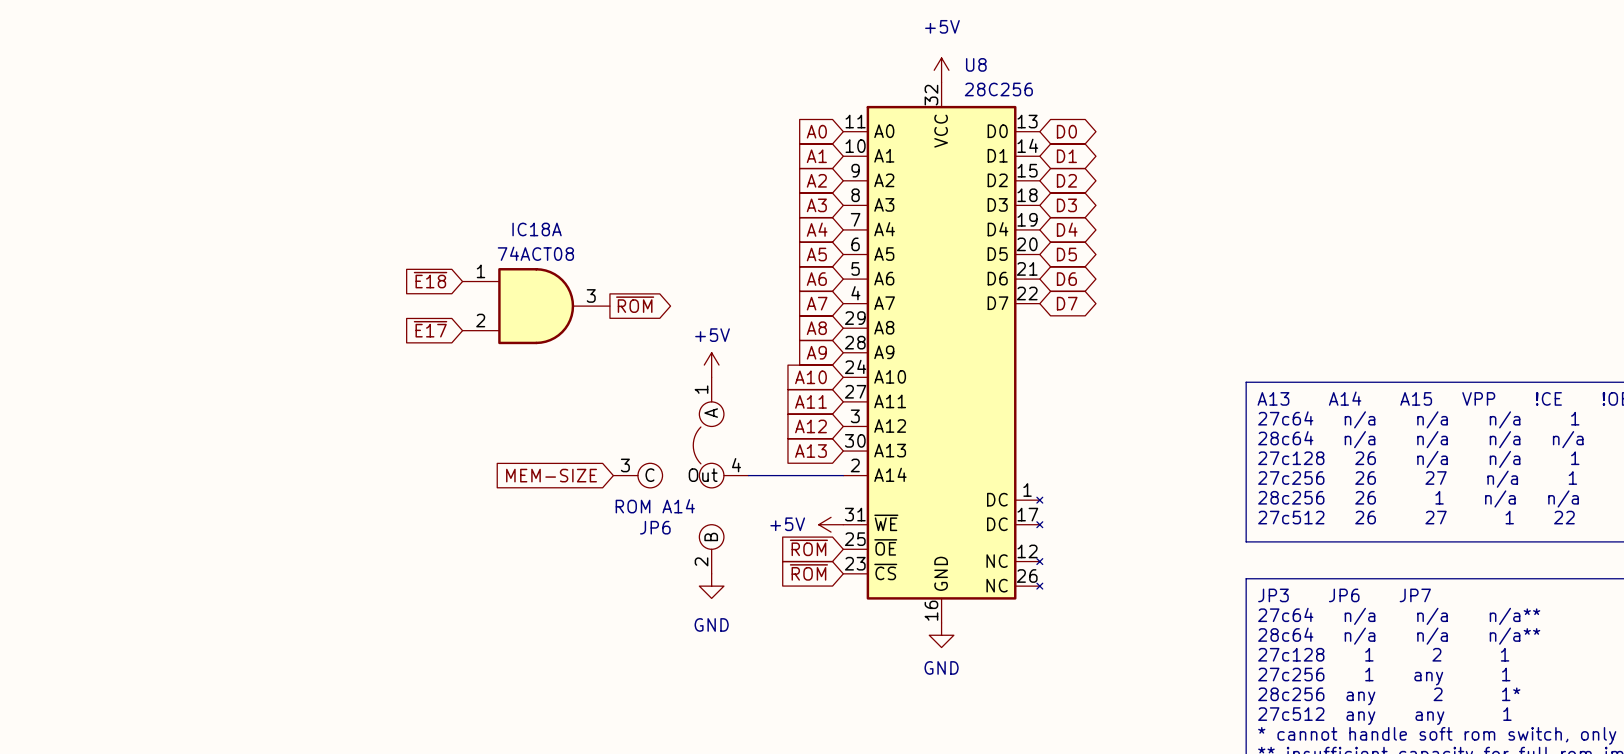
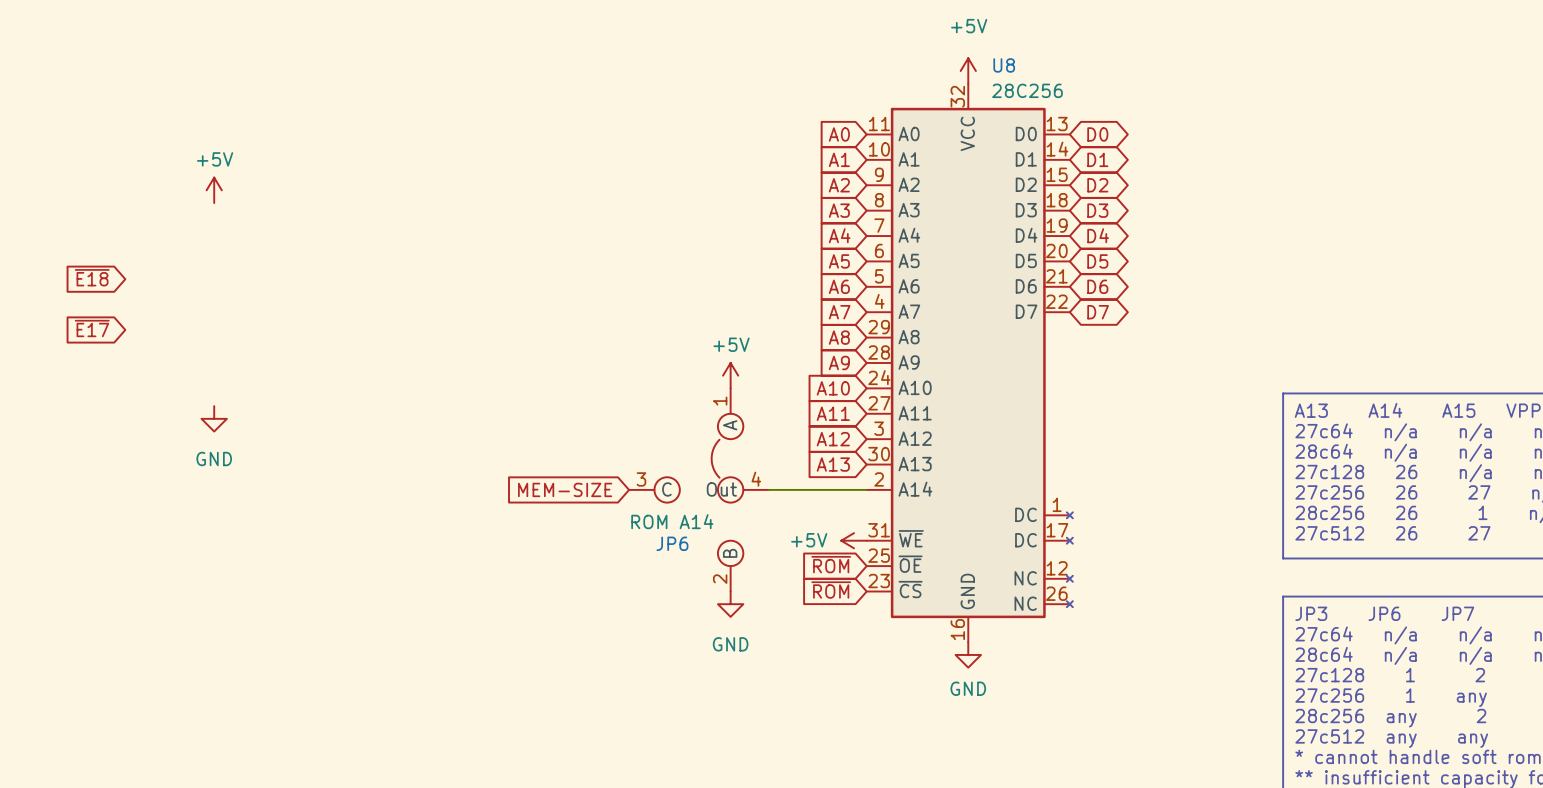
power symbol: none -> +5V (214, 190)
global label: none -> ~{E18} (92, 277)
global label: ~{E18} (430, 280) -> none
global label: ~{ROM} (635, 304) -> none
IC18A: 74ACT08 (536, 306) -> none
global label: none -> ~{E17} (92, 328)
global label: ~{E17} (430, 329) -> none
power symbol: none -> GND (214, 418)

